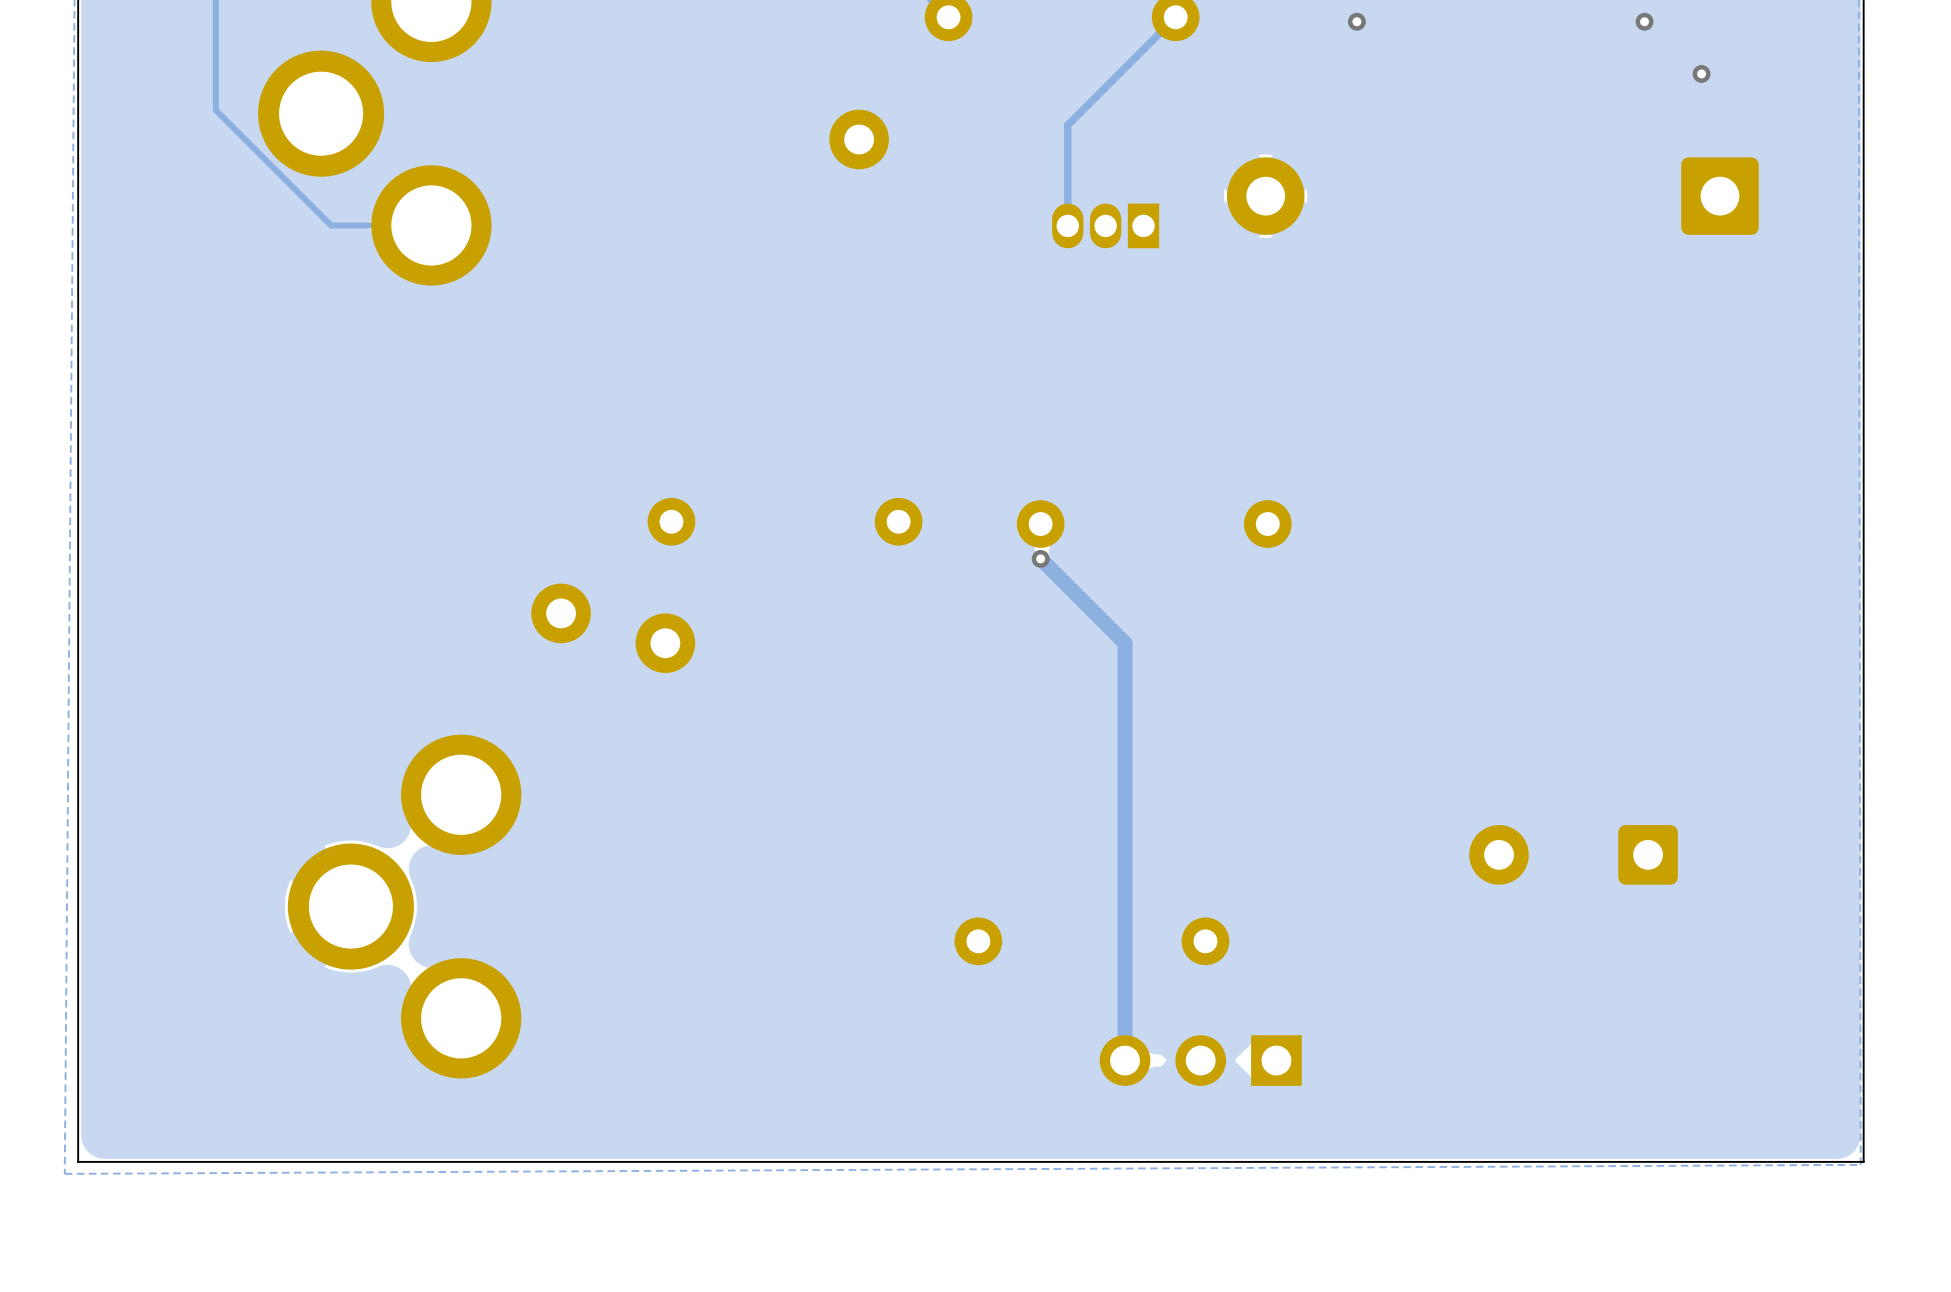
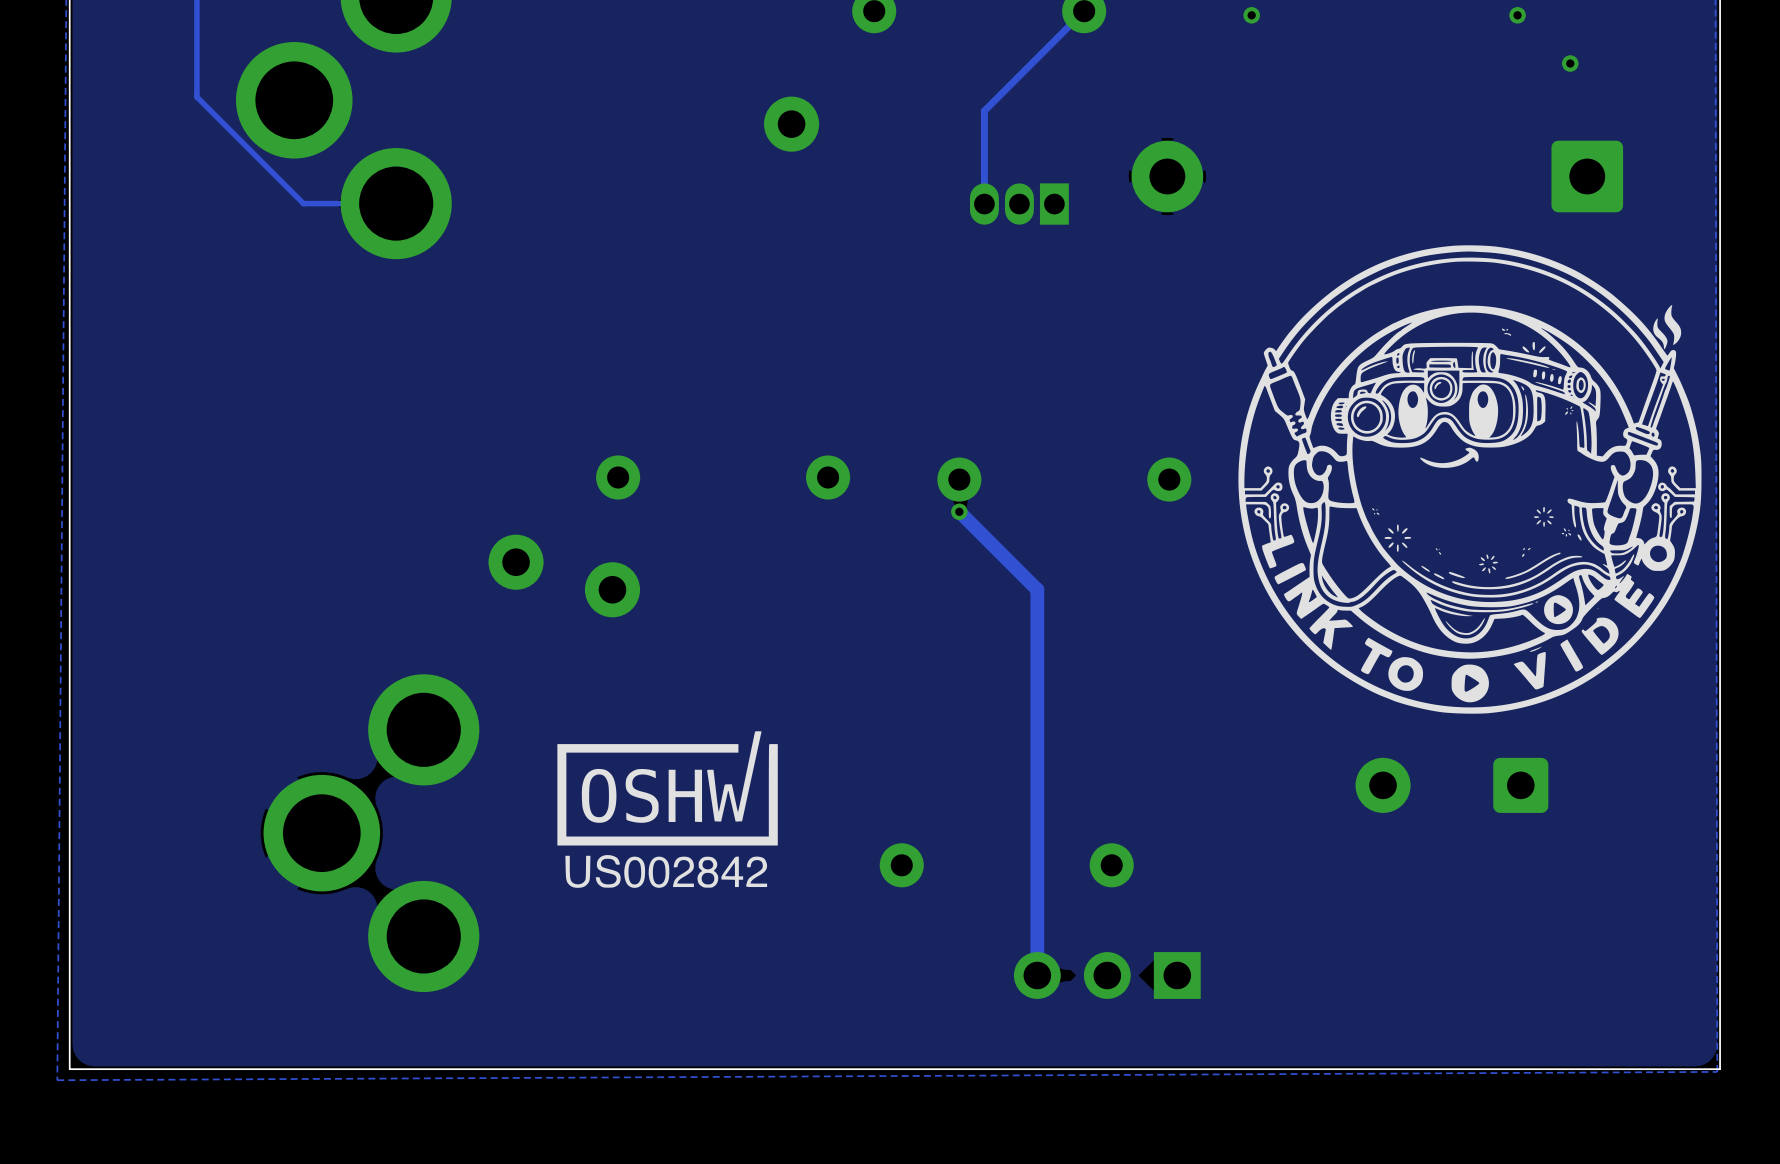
drawing: none -> [1238, 245, 1702, 714]
drawing: none -> [557, 731, 778, 888]

